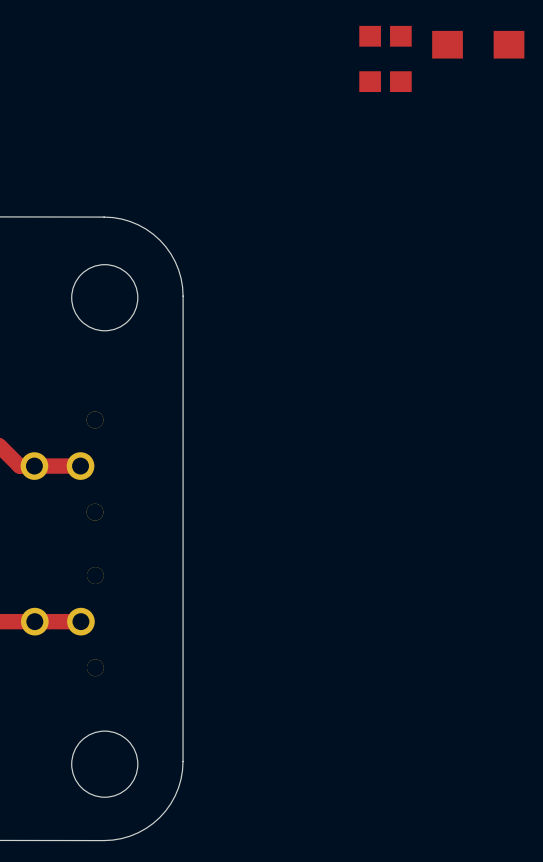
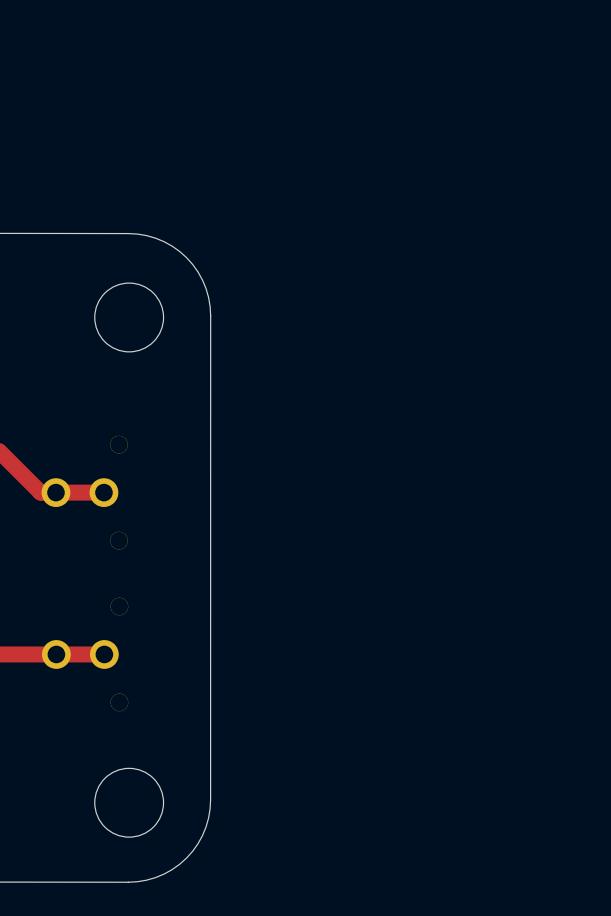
part: (385, 36) -> none
part: (478, 44) -> none
part: (385, 81) -> none

